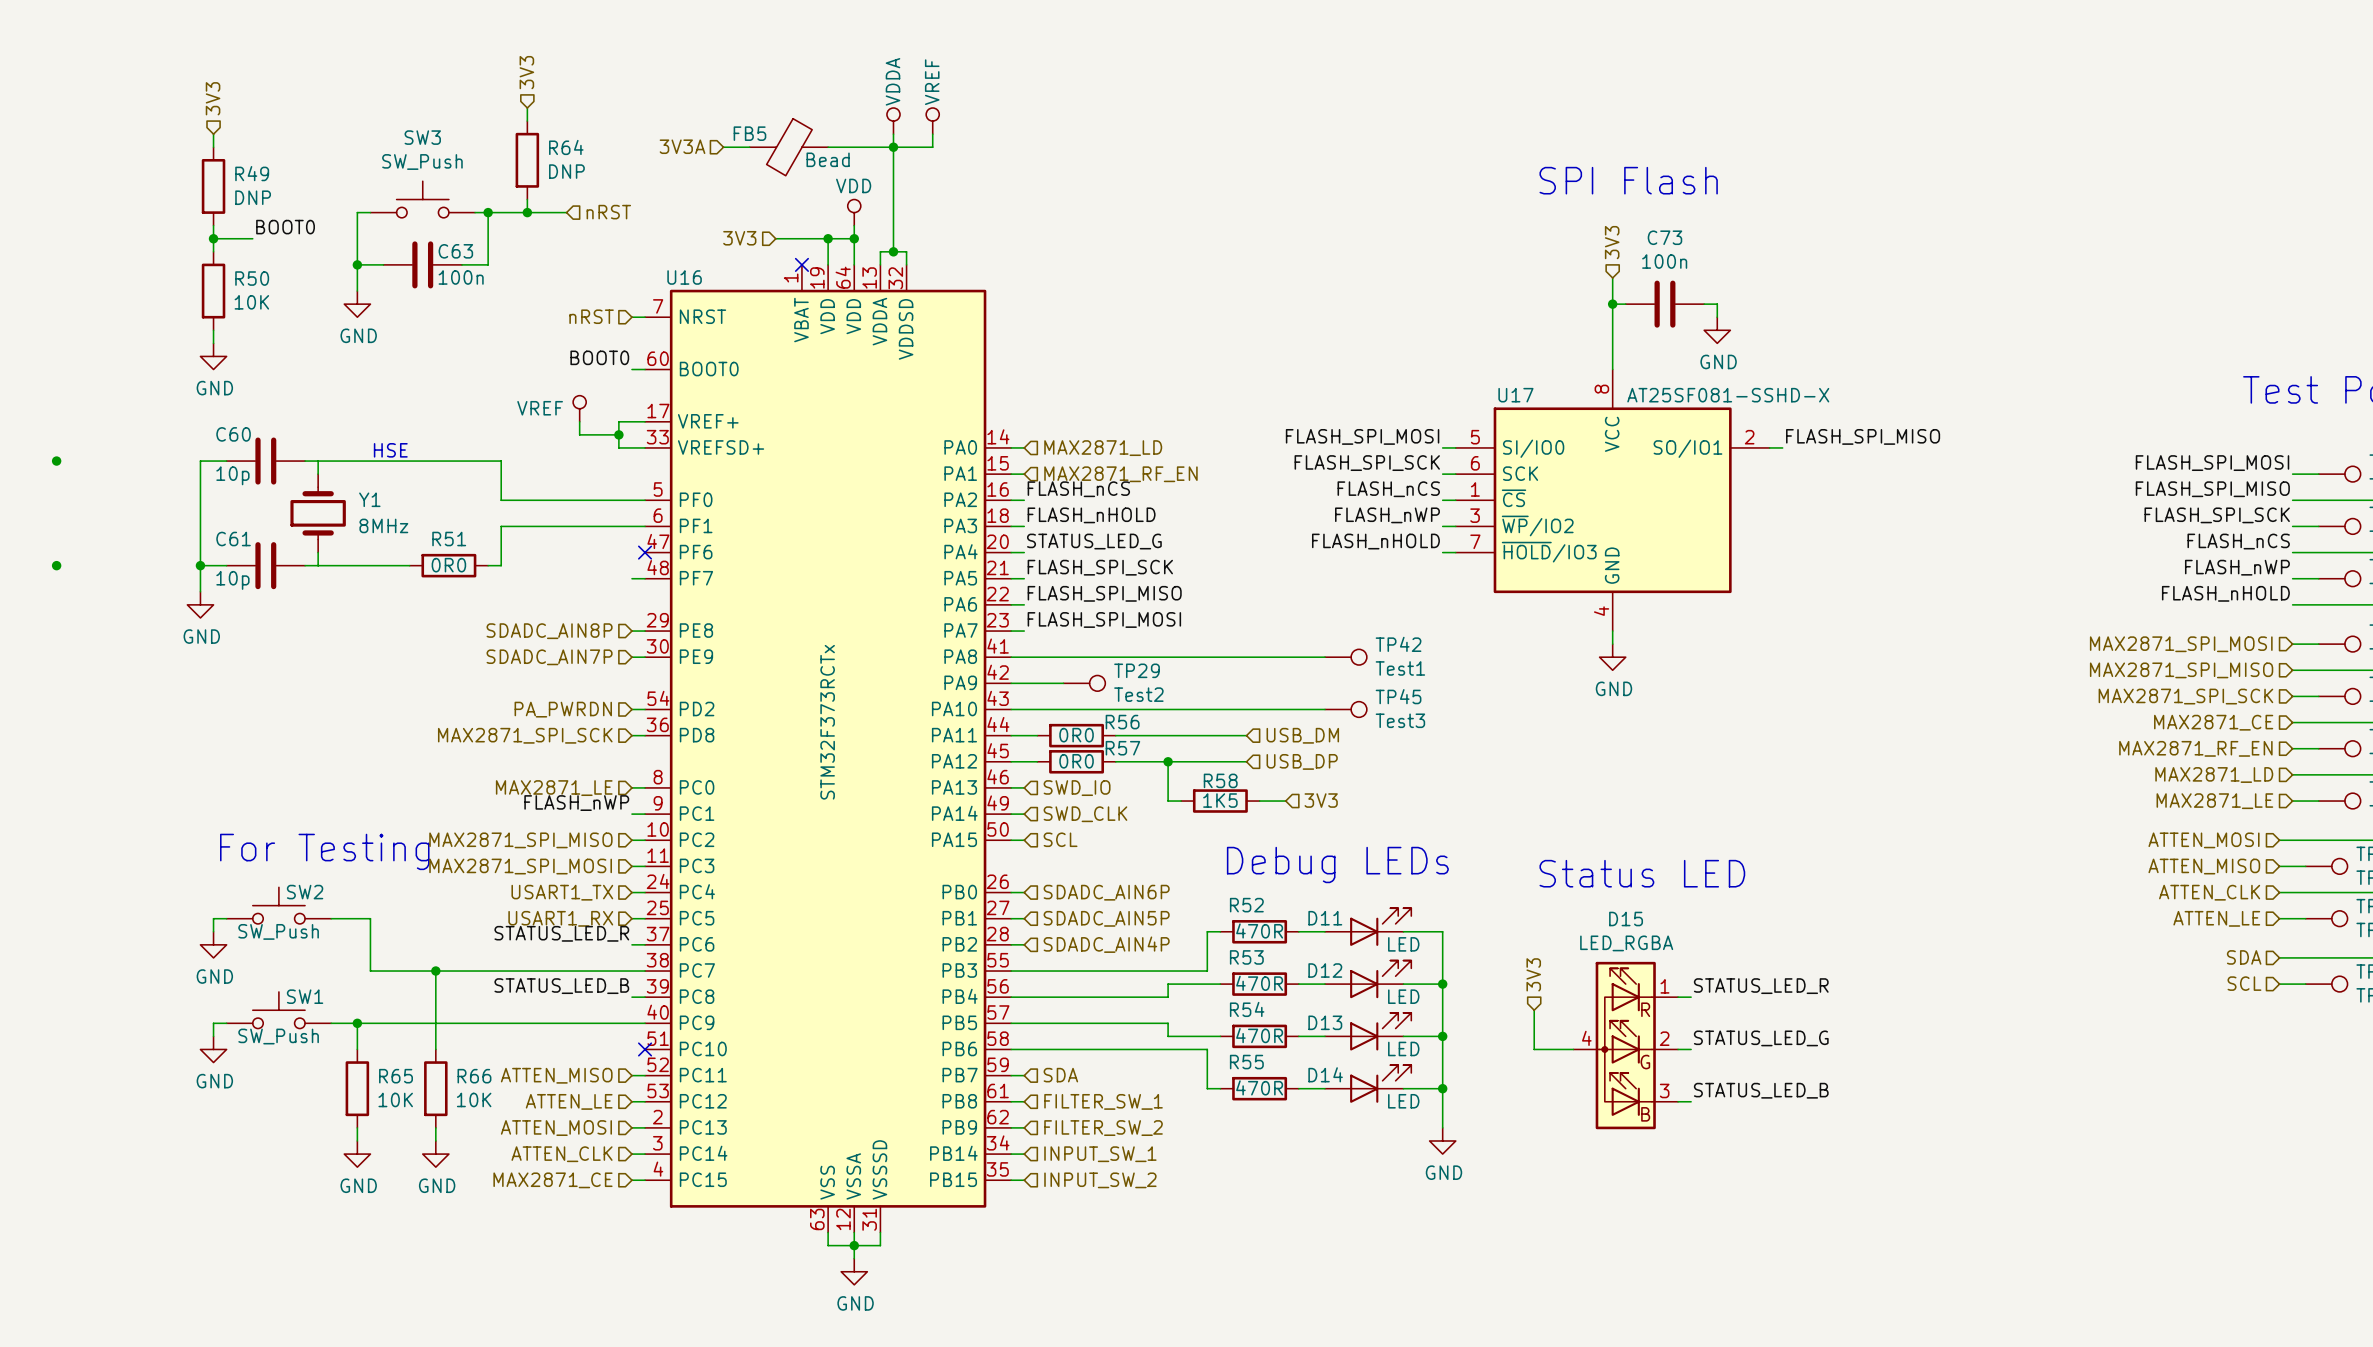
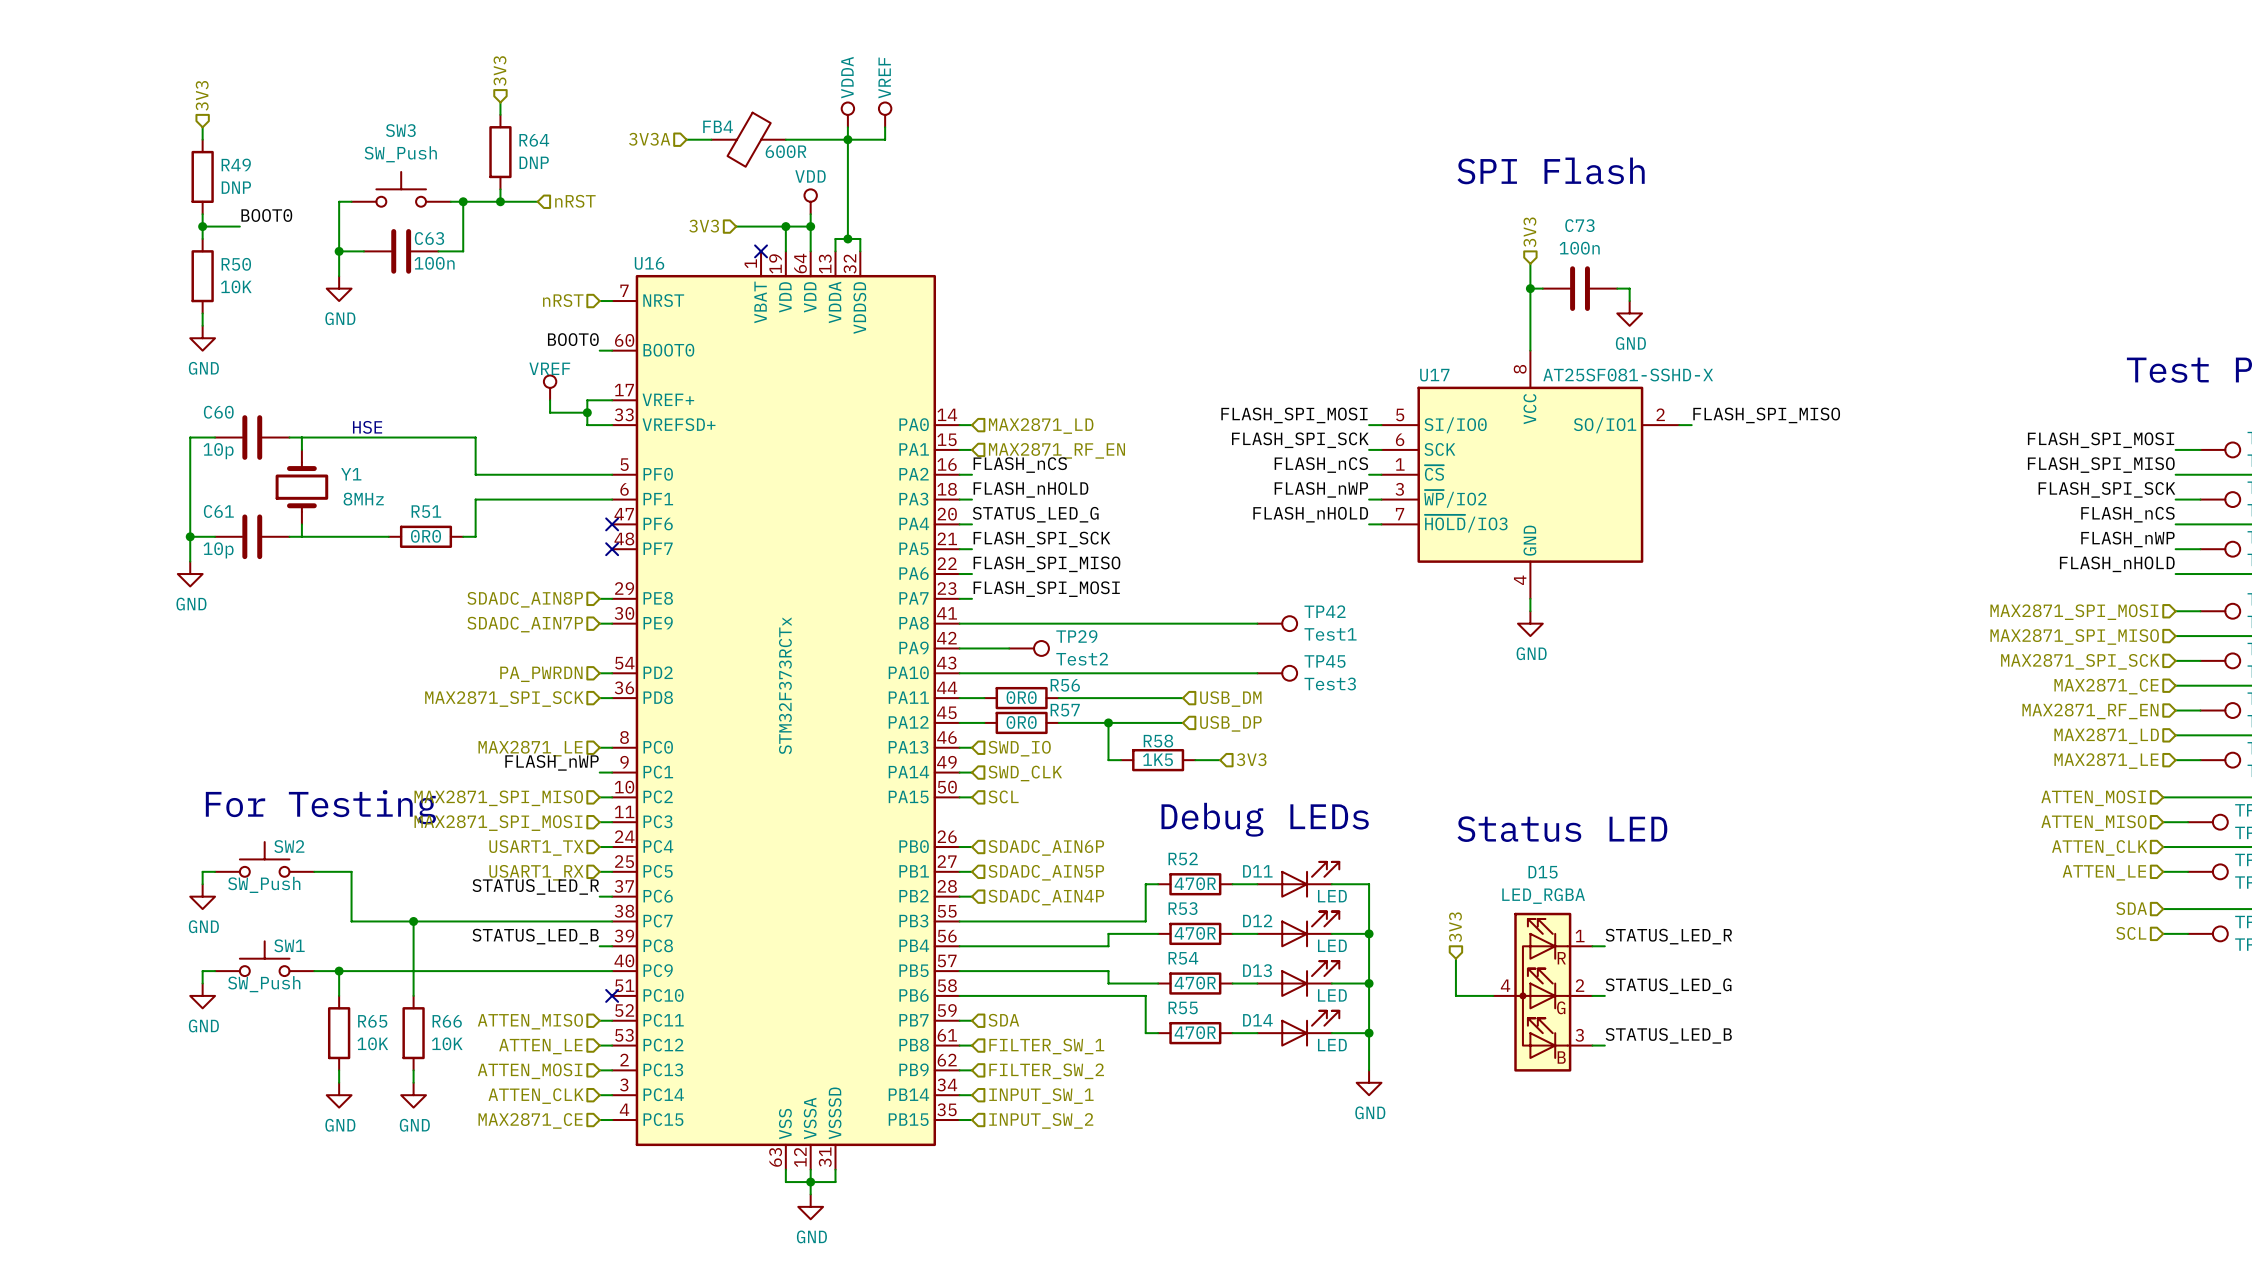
FB5 name: FB5 (749, 133) -> FB4 (718, 126)
FB5 value: Bead (828, 159) -> 600R (785, 151)
power symbol text position: VREF (540, 408) -> VREF (549, 368)
junction: (56, 461) -> none
junction: (56, 565) -> none
wire: (631, 578) (645, 578) -> none
no-connect mark: none -> (612, 549)

